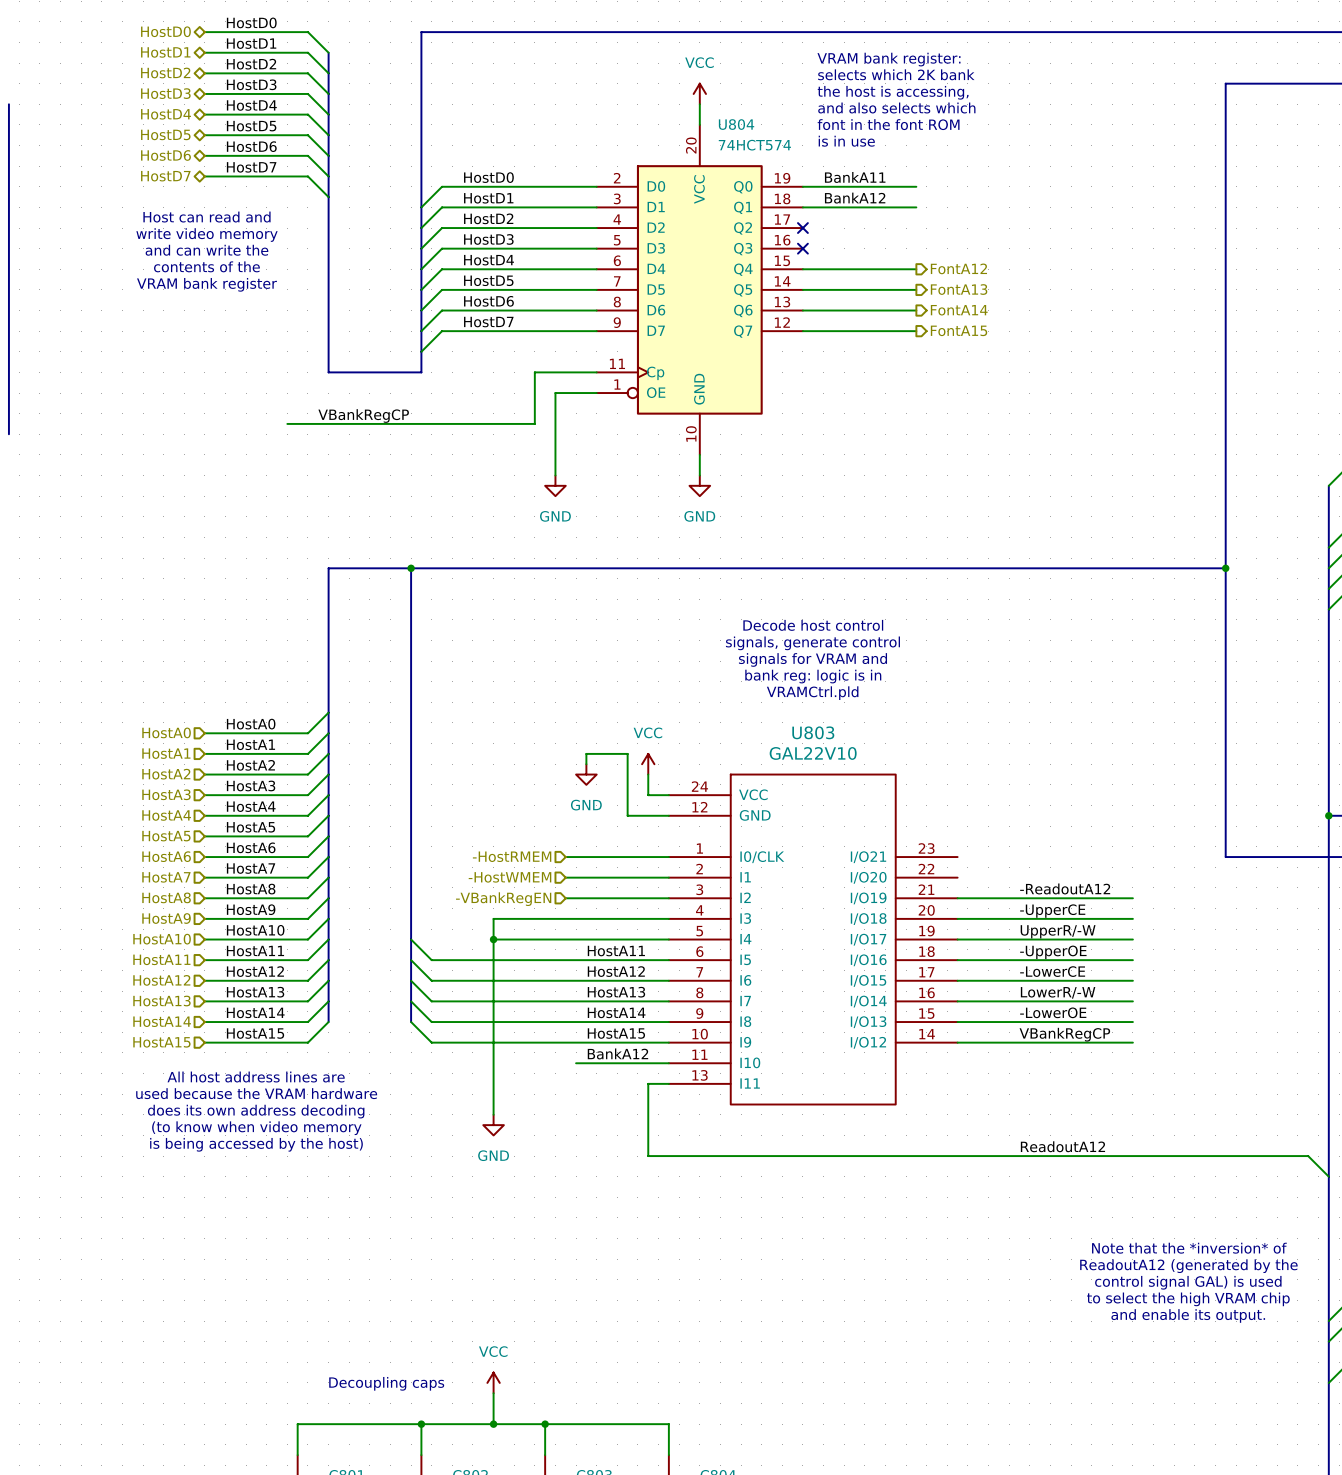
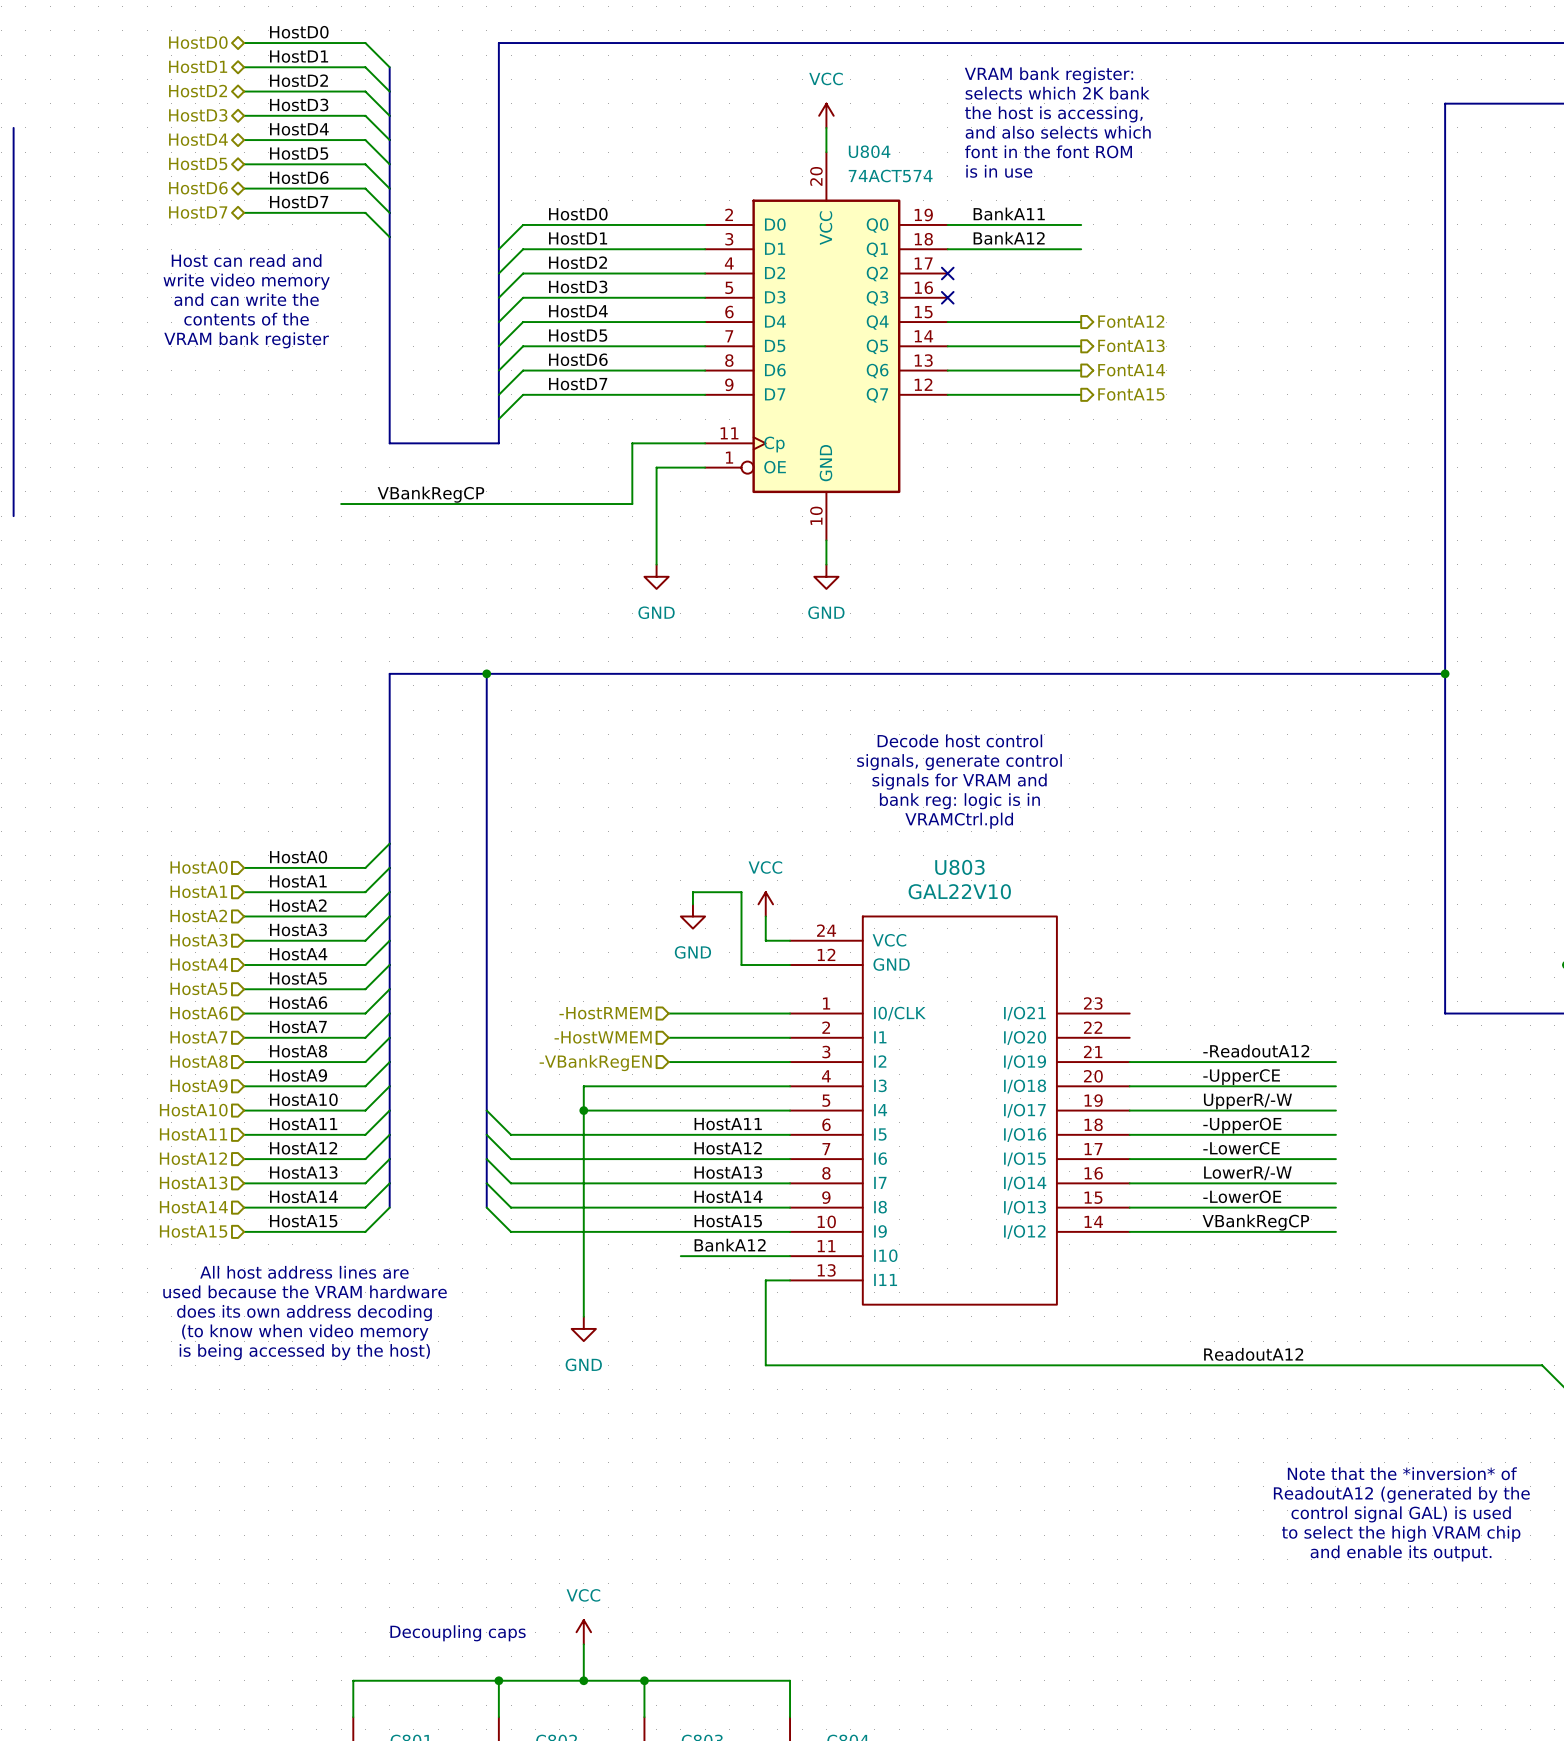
U804 value: 74HCT574 (754, 145) -> 74ACT574 (890, 176)

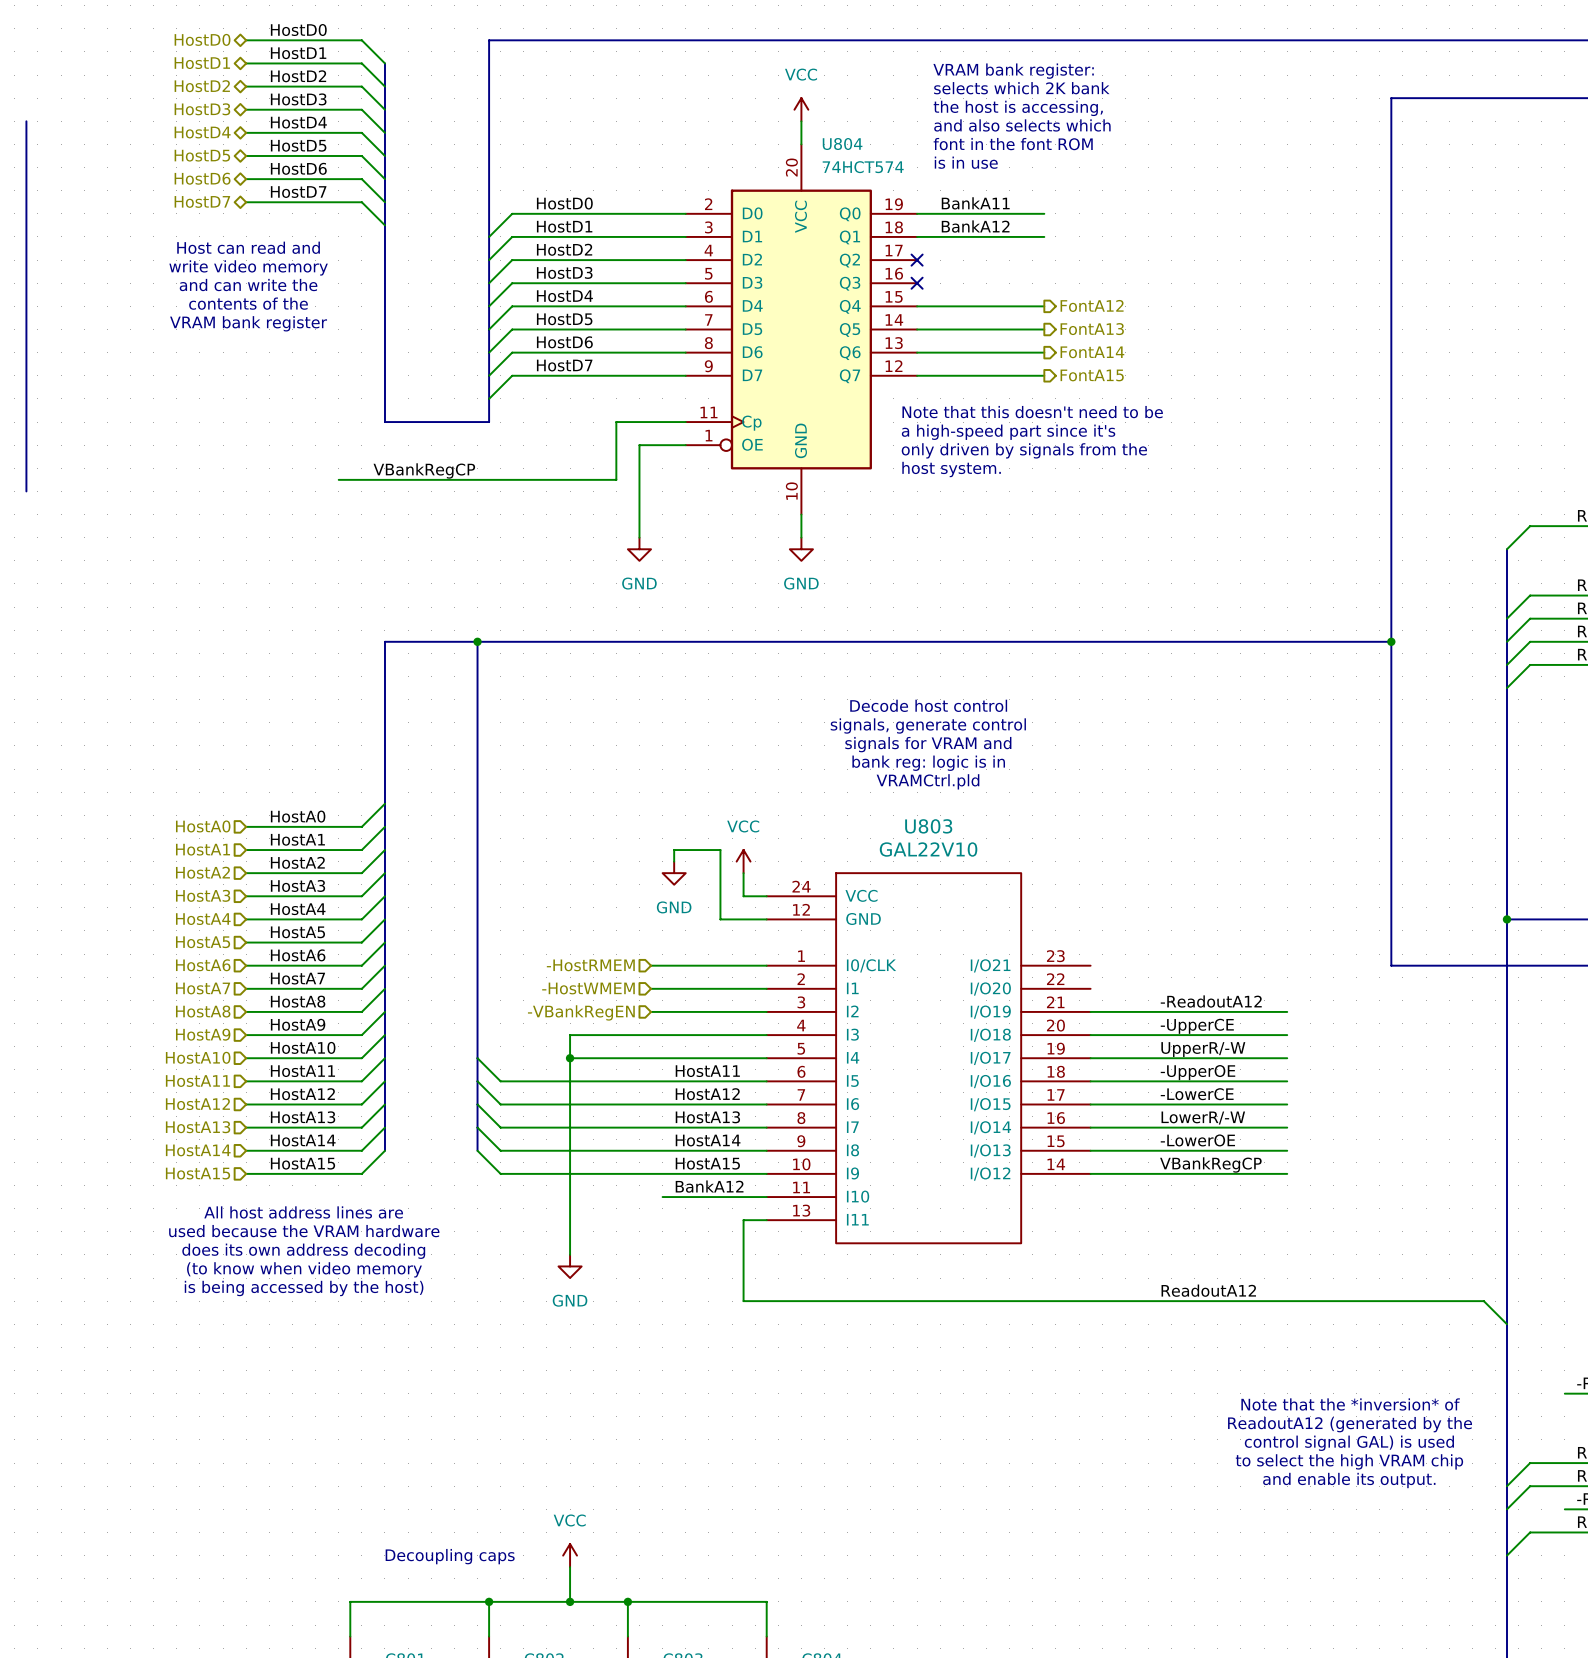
U804 value: 74ACT574 (890, 176) -> 74HCT574 (863, 167)
text: none -> Note that this doesn't need to be (1032, 412)
text: none -> a high-speed part since it's (1008, 432)
text: none -> only driven by signals from the (1024, 450)
text: none -> host system. (951, 469)

